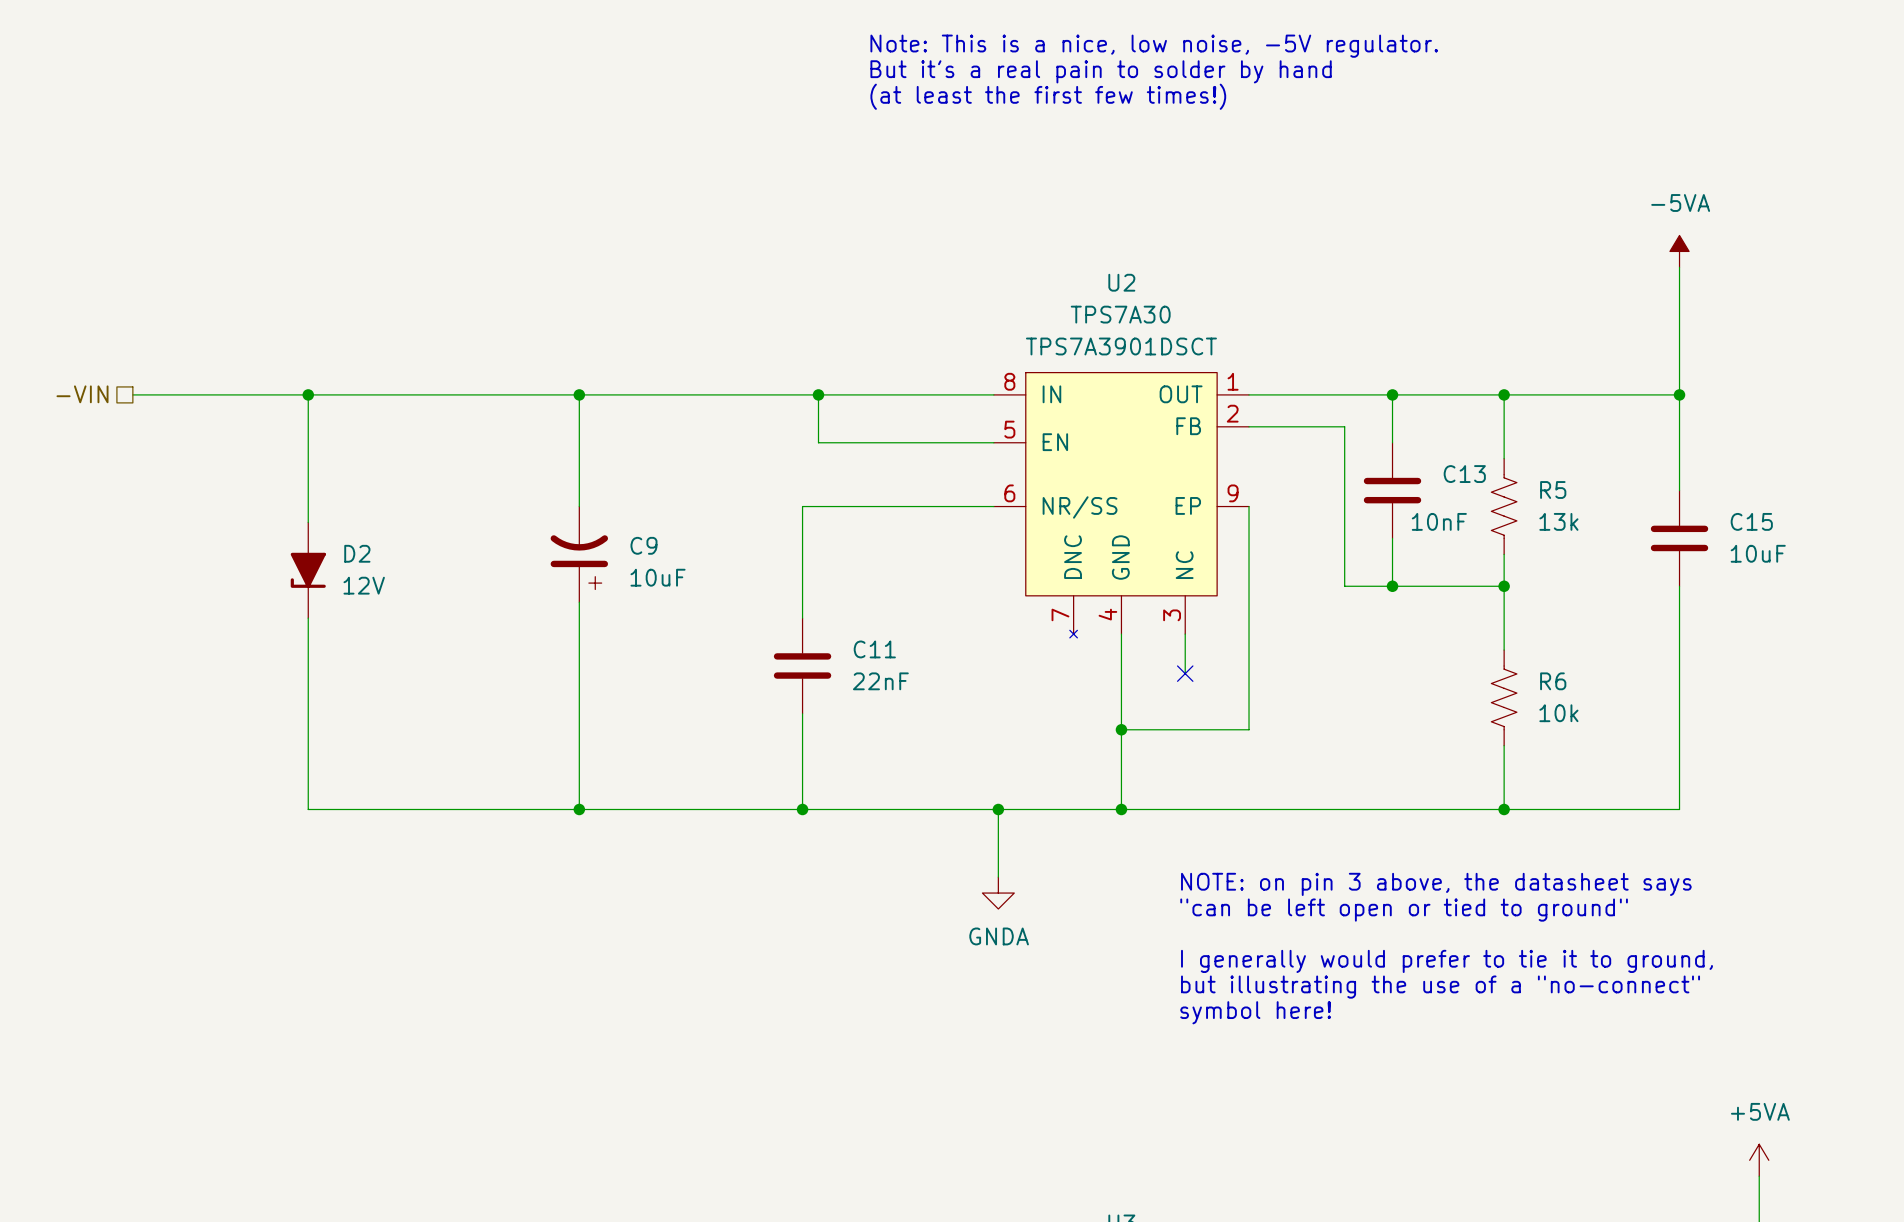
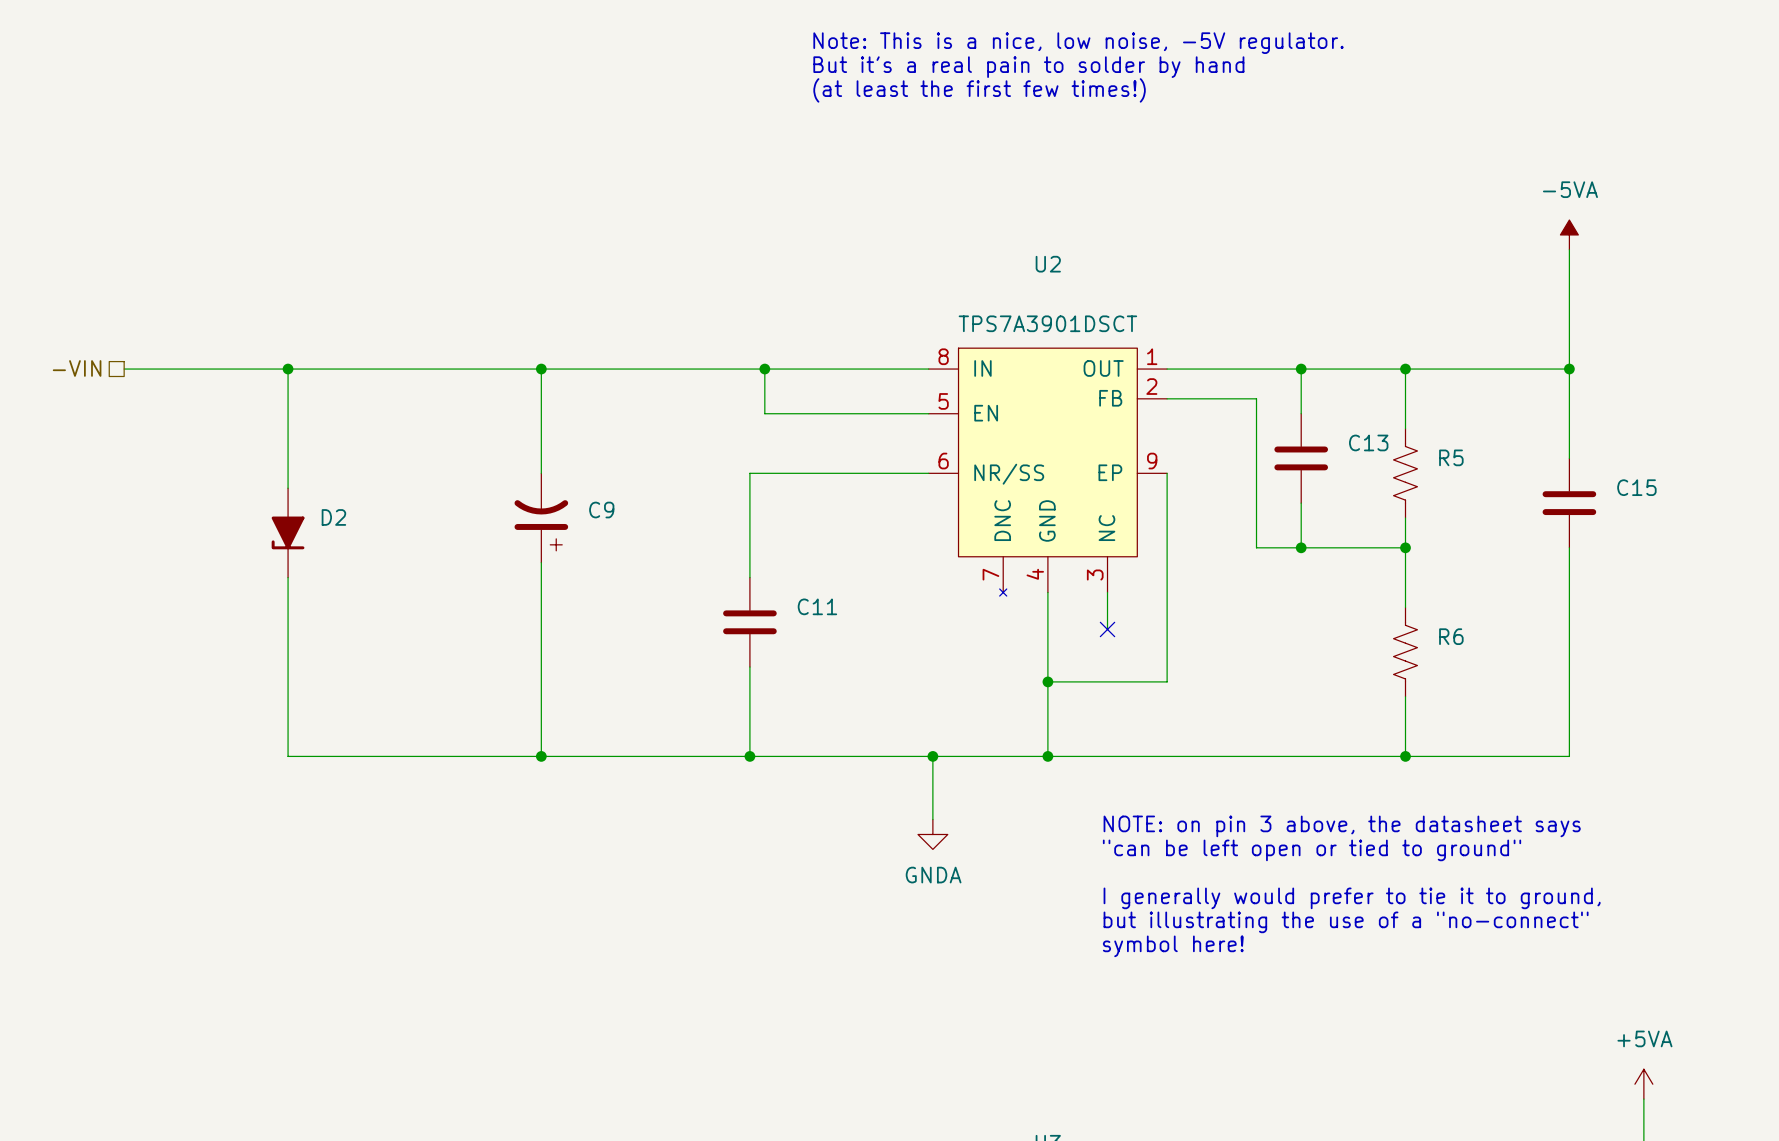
U2 value: TPS7A30 (1120, 314) -> none
C13 value: 10nF (1439, 521) -> none
R5 value: 13k (1558, 521) -> none
C15 value: 10uF (1758, 553) -> none
C9 value: 10uF (658, 577) -> none
D2 value: 12V (364, 585) -> none
C11 value: 22nF (880, 681) -> none
R6 value: 10k (1558, 713) -> none

